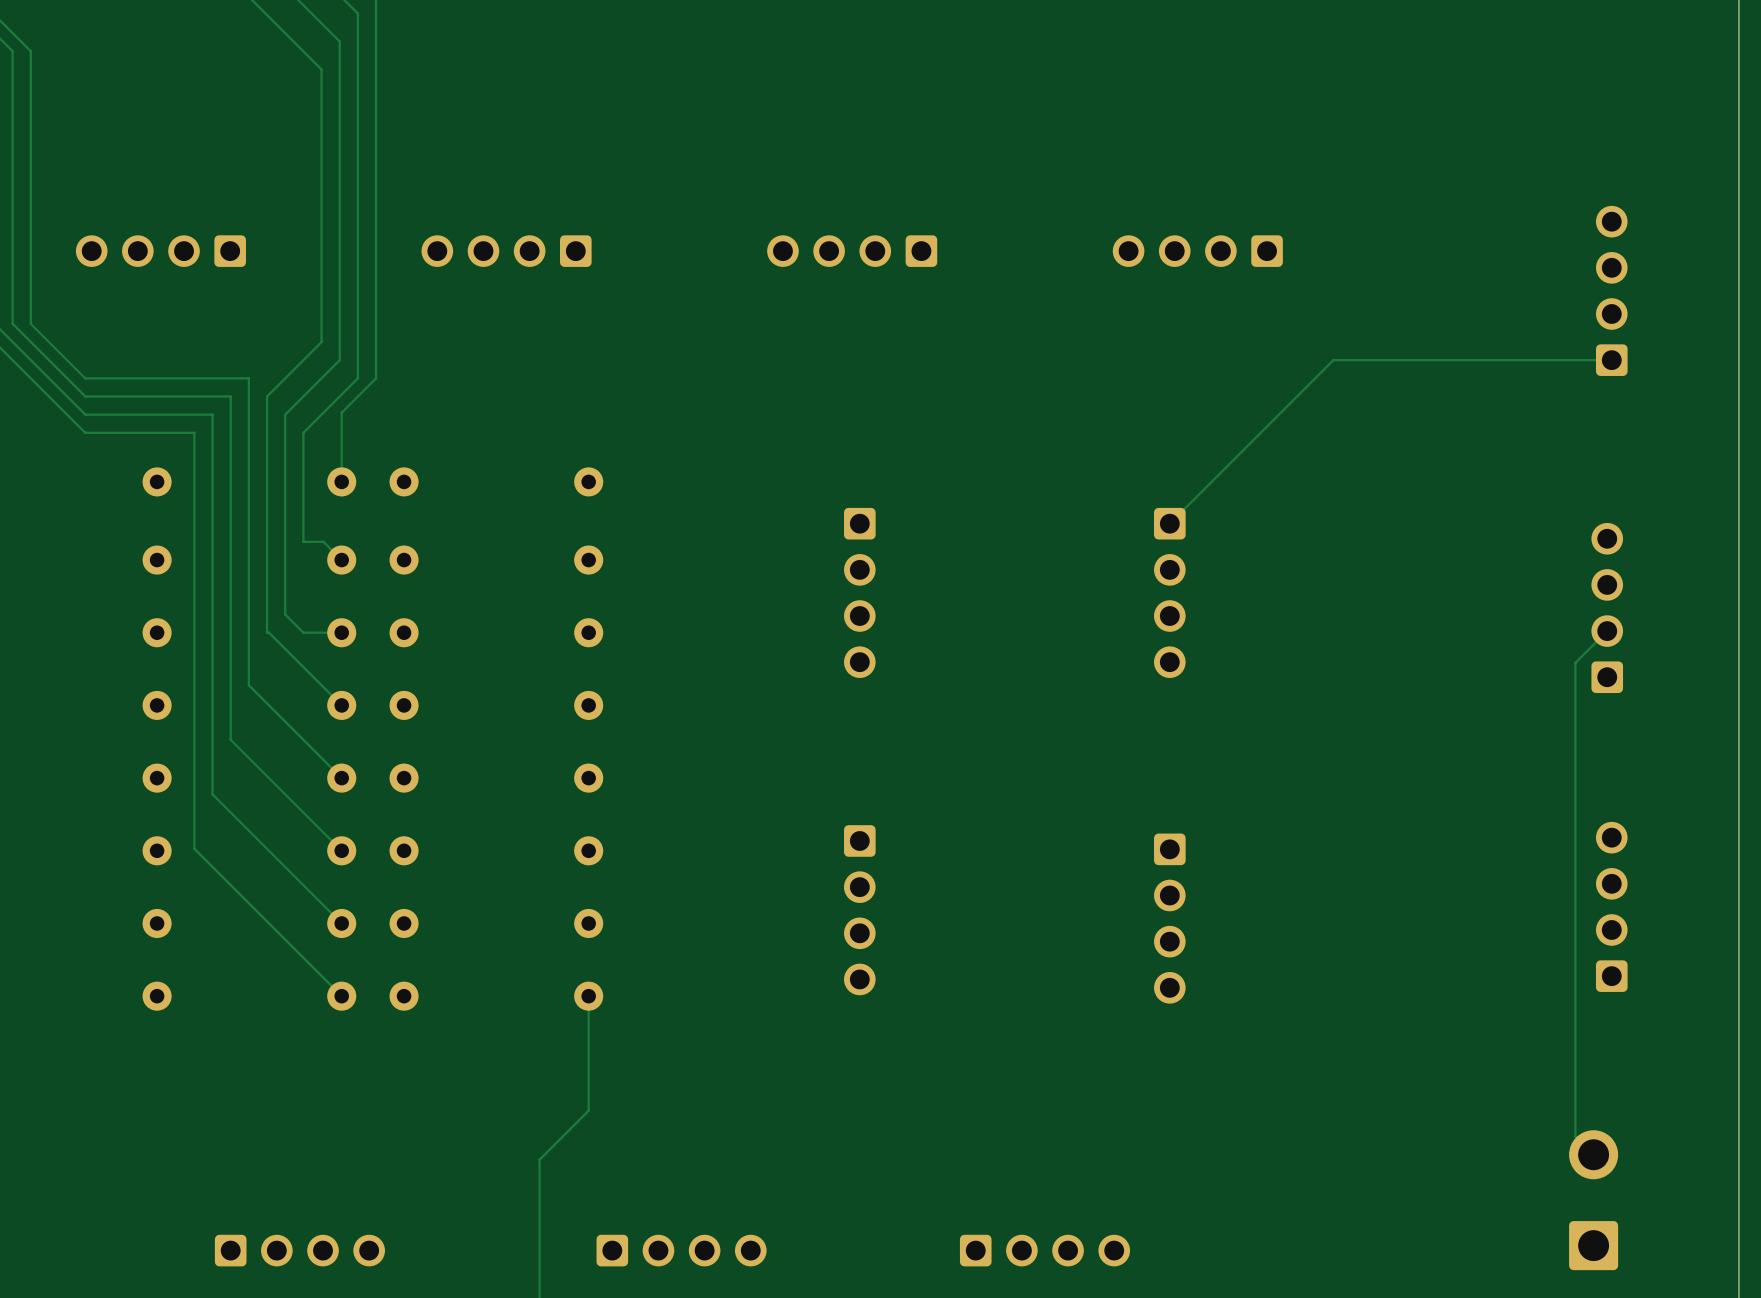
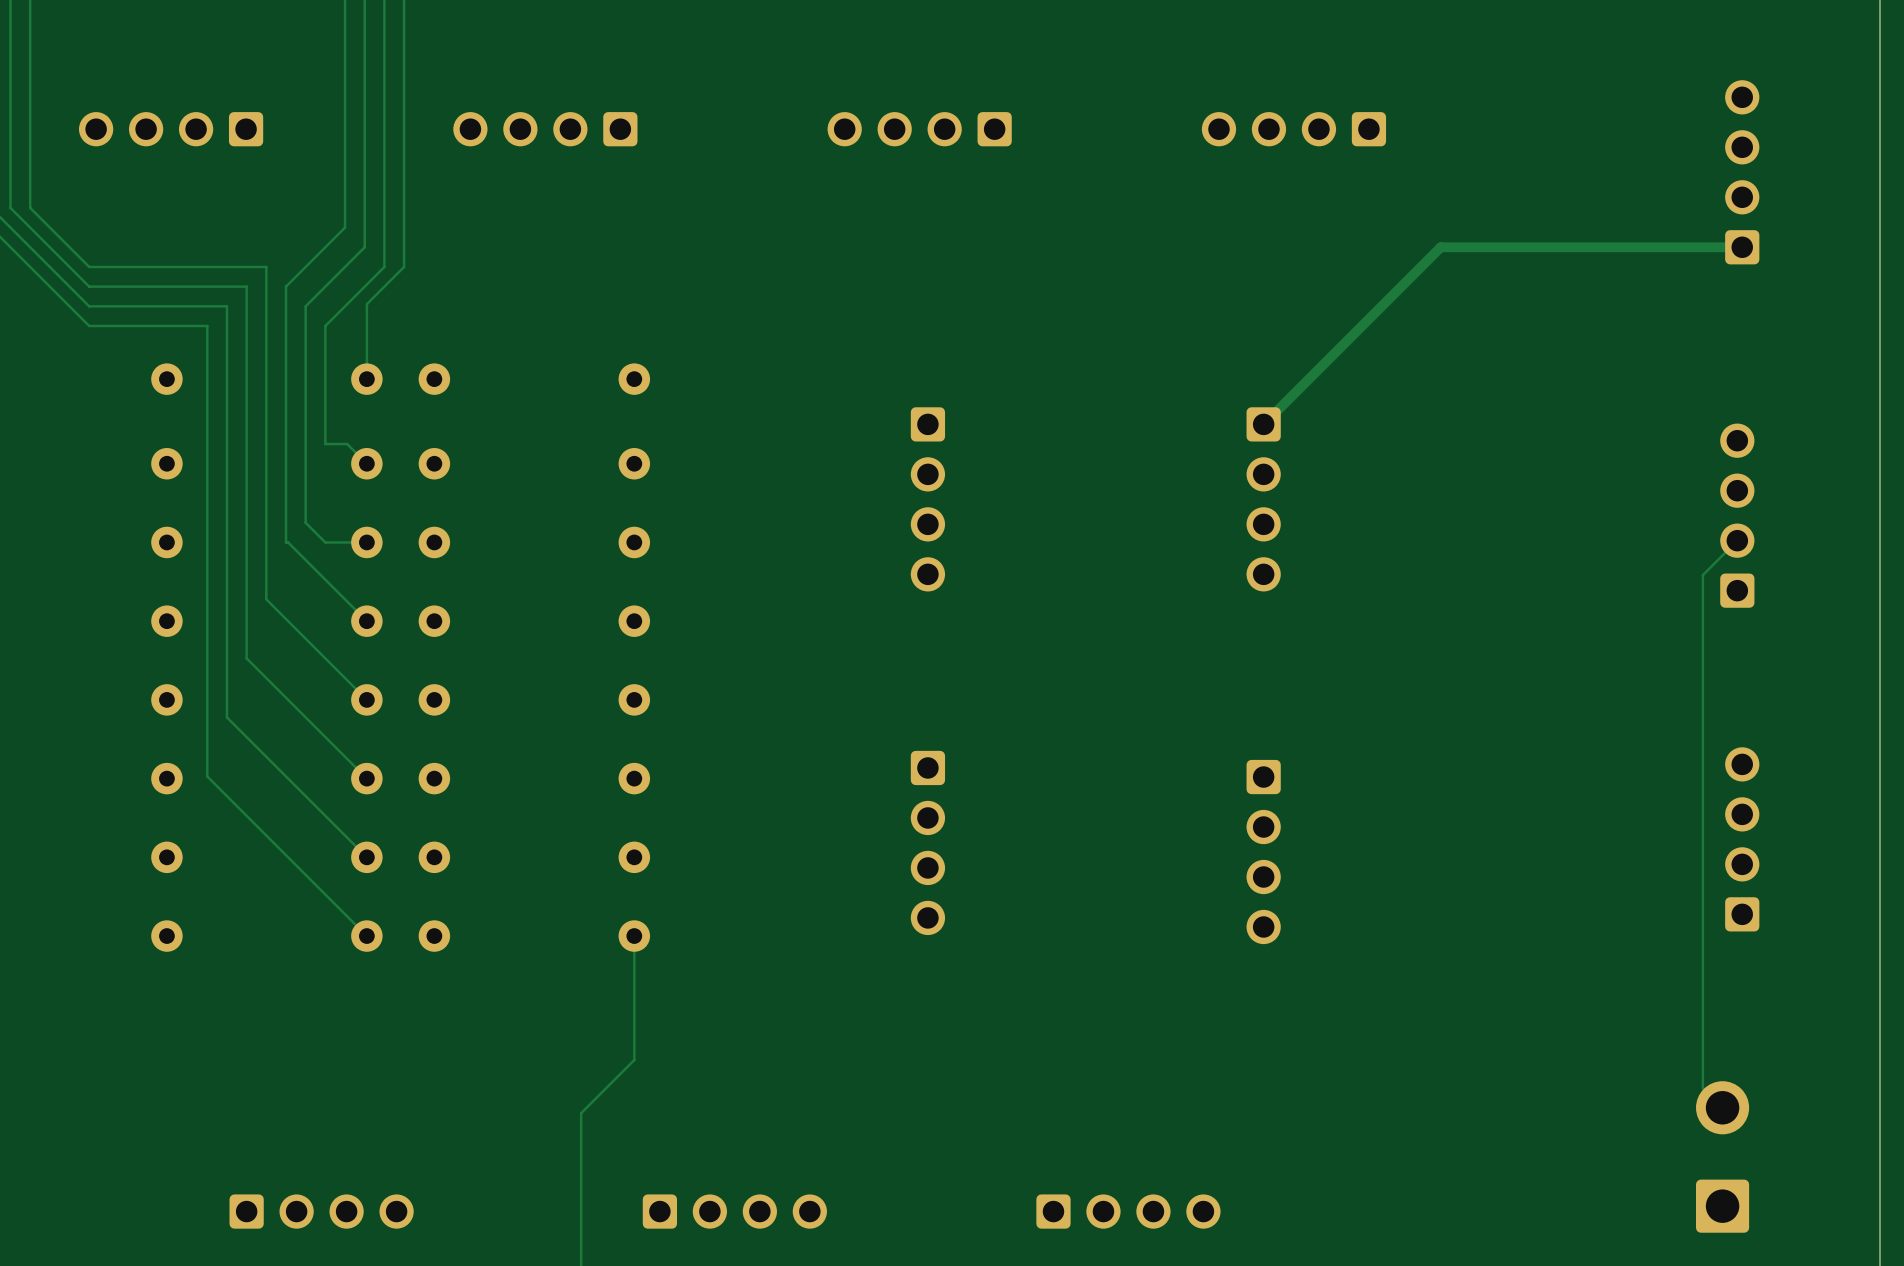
track width: thin (1611, 360) (1333, 360) (1169, 523) -> thick (1742, 247) (1440, 247) (1263, 424)

